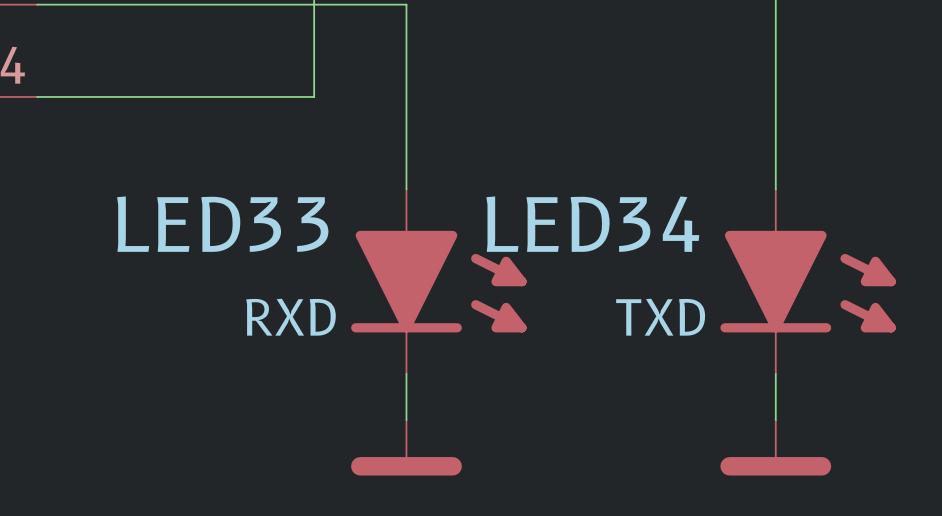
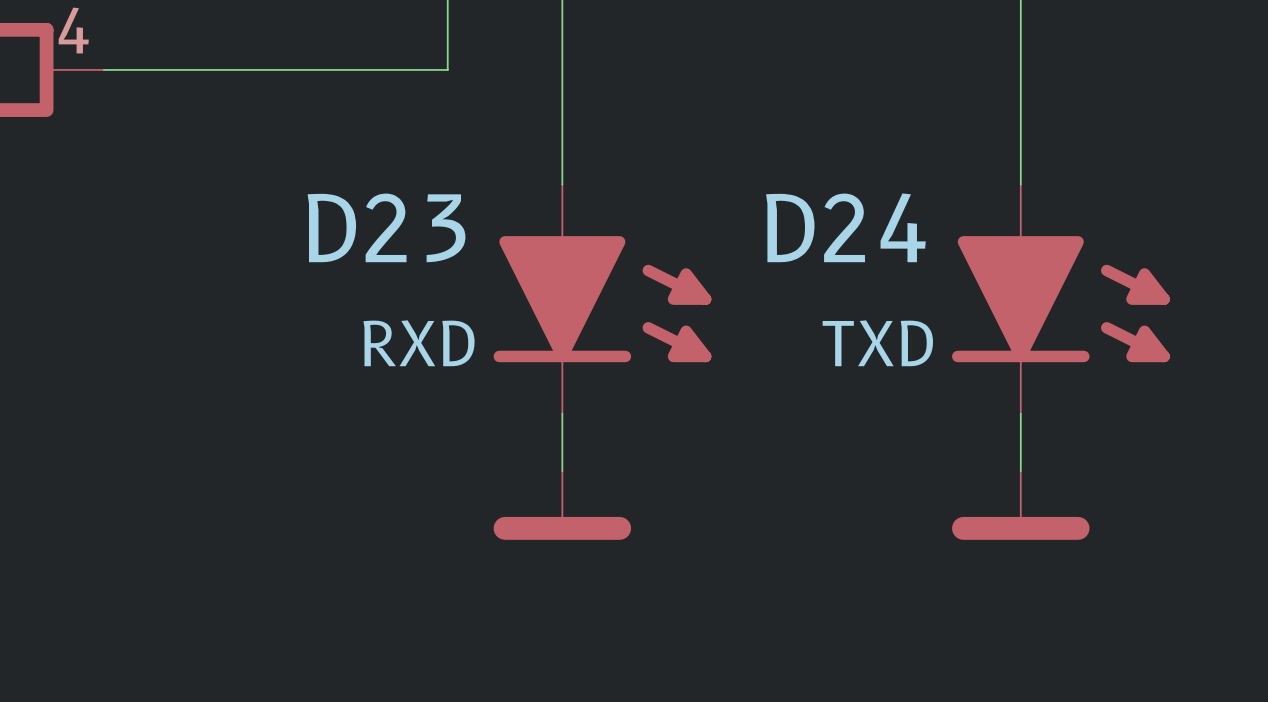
LED33 name: LED33 (222, 224) -> D23 (386, 227)
LED34 name: LED34 (592, 224) -> D24 (845, 227)

